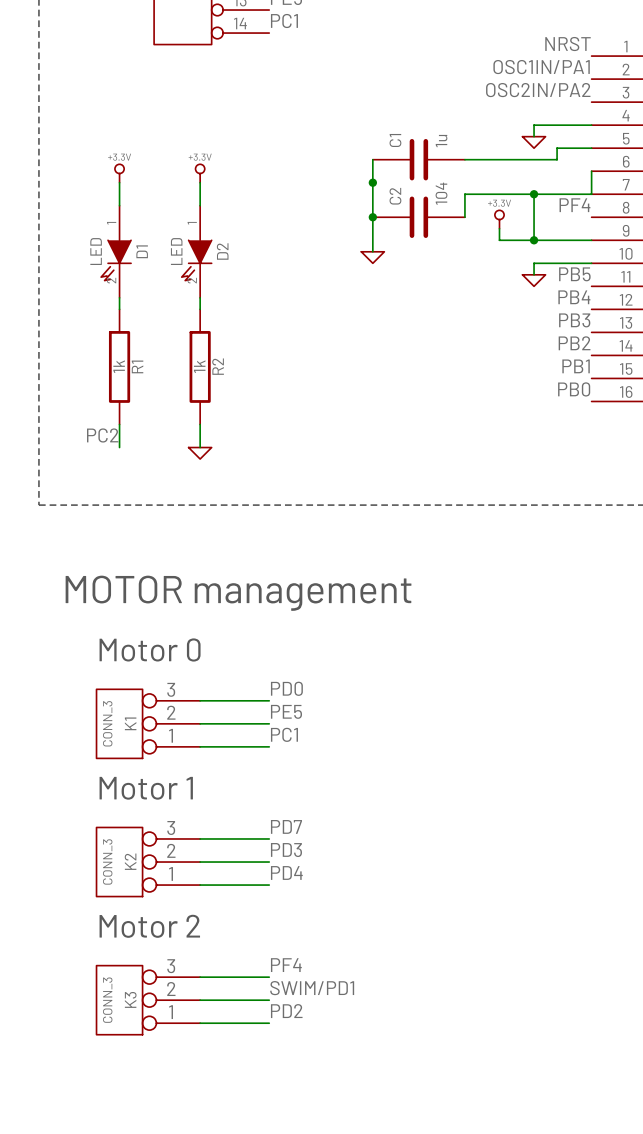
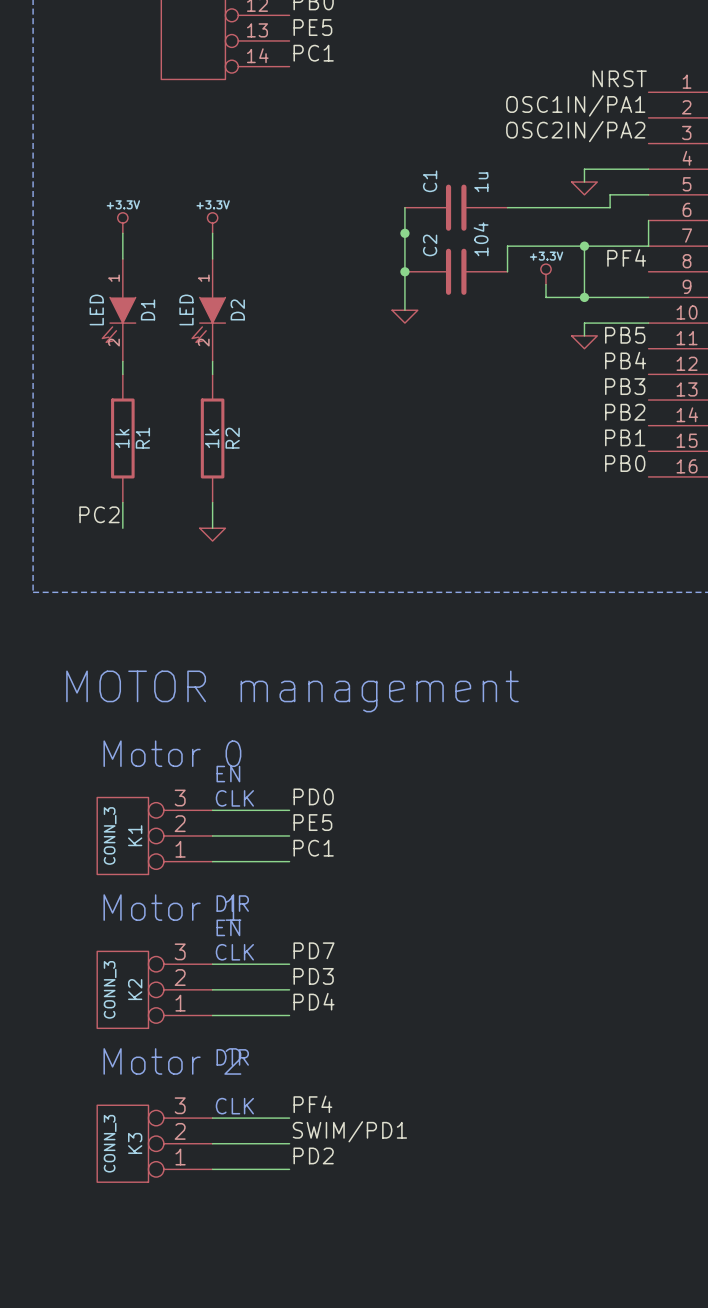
text: none -> EN (228, 774)
text: none -> CLK (234, 798)
text: none -> DIR (232, 903)
text: none -> EN (228, 927)
text: none -> CLK (234, 952)
text: none -> DIR (232, 1057)
text: none -> CLK (234, 1106)

